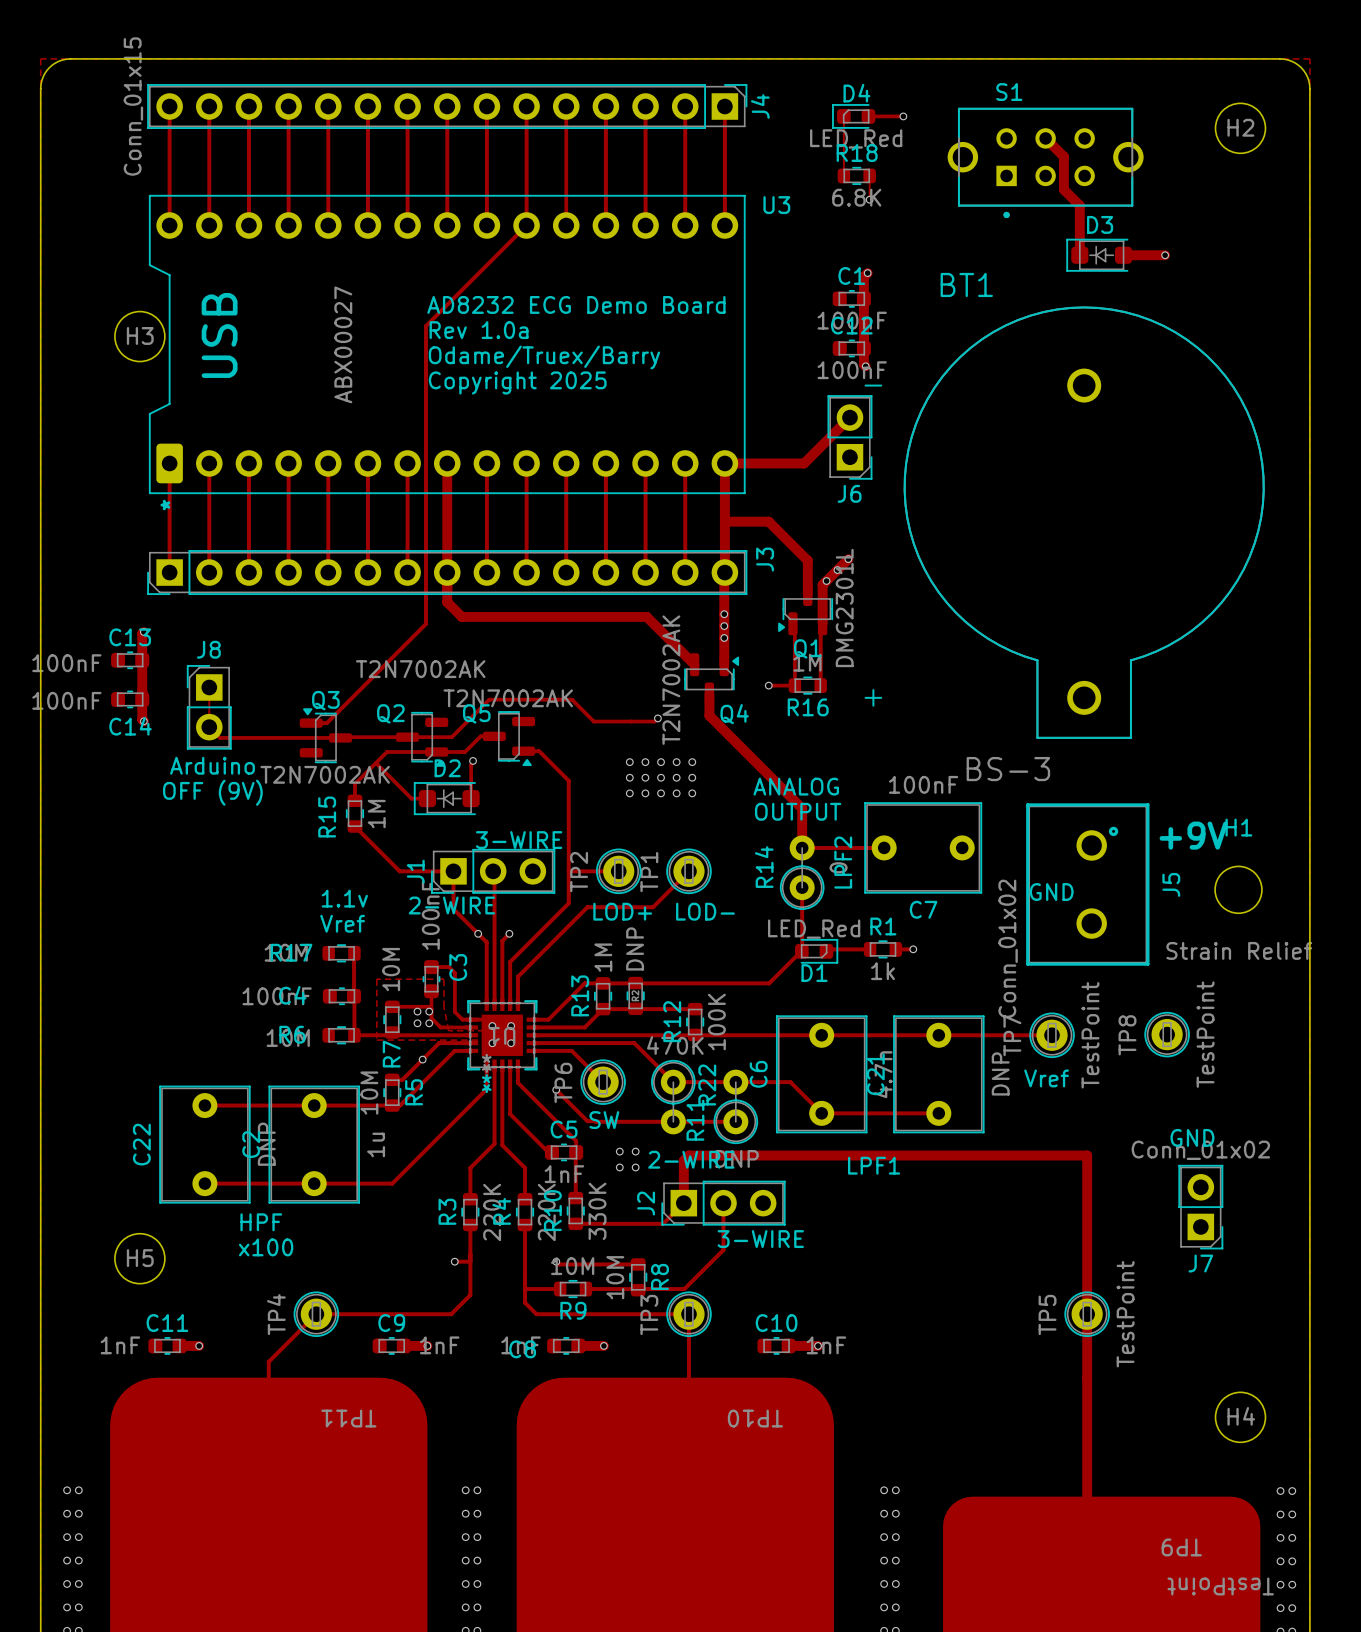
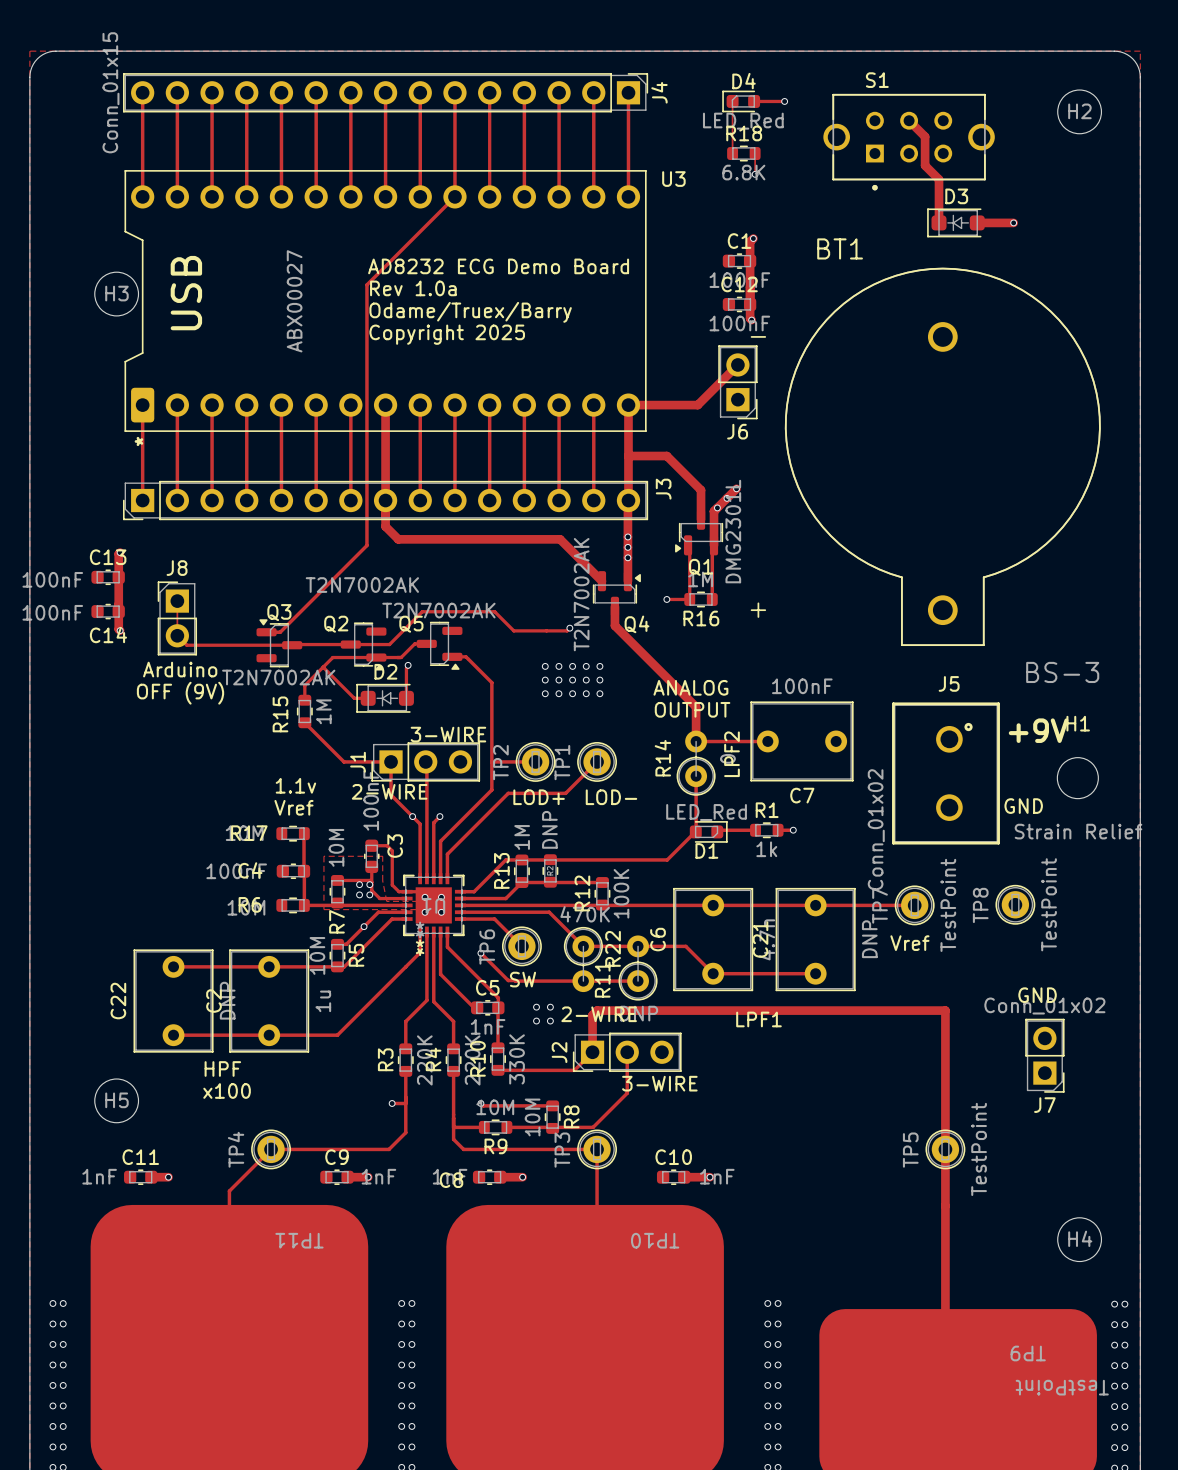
BT1 value position: BS-3 (1008, 769) -> BS-3 (1062, 672)
J5 name rotation: 0° (1171, 884) -> 90° clockwise (949, 683)
J5 name position: J5 (1171, 884) -> J5 (949, 683)
text position: GND (1051, 892) -> GND (1023, 806)

